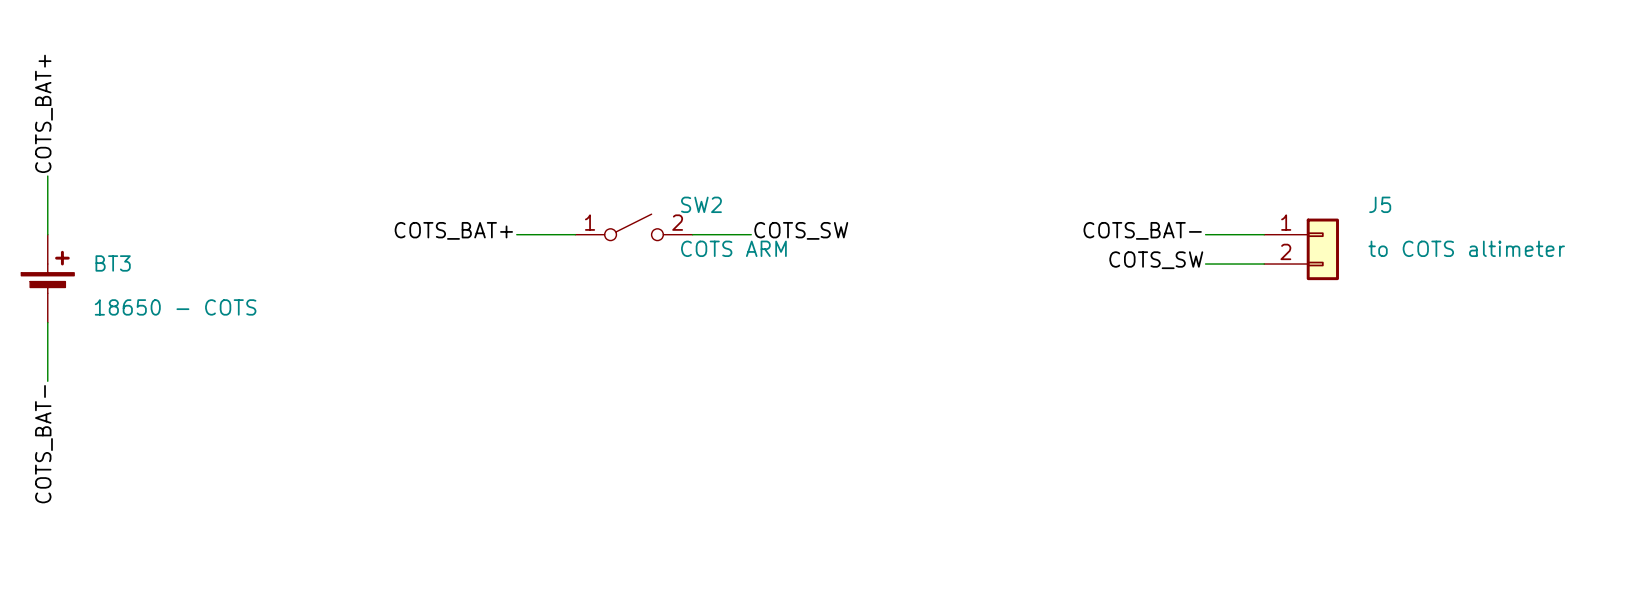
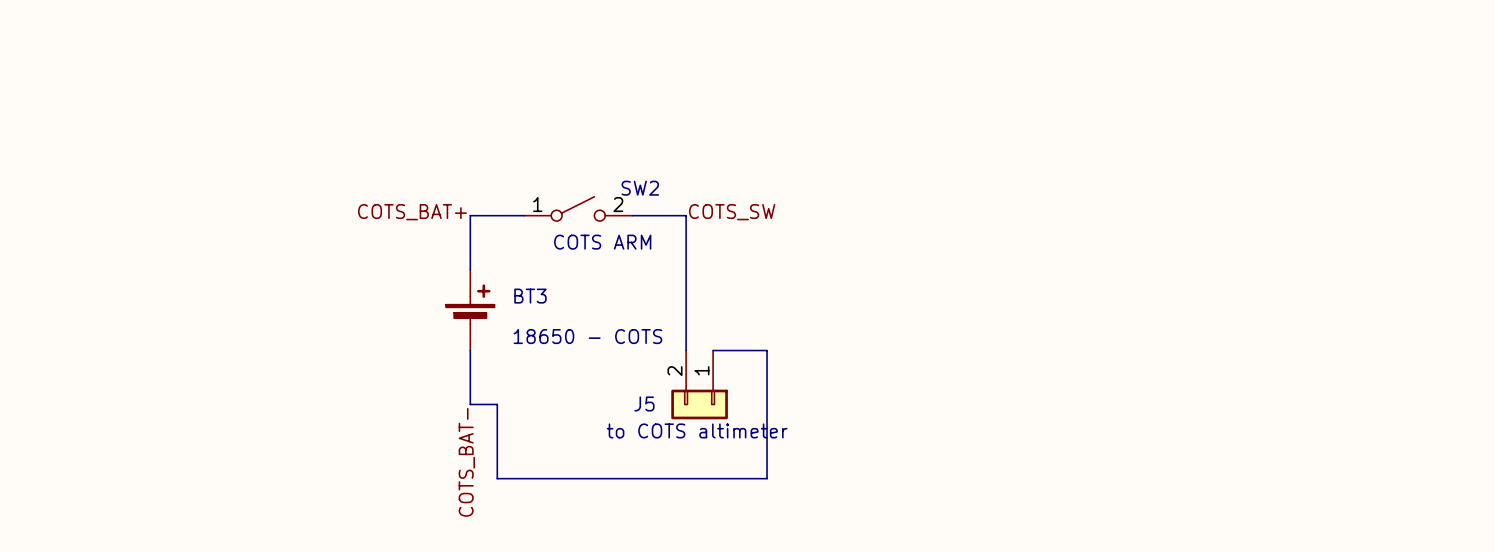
label: COTS_BAT+ (43, 113) -> none
wire: (47, 176) (47, 234) -> none
J5 name position: J5 (1380, 204) -> J5 (644, 403)
label: COTS_BAT- (1142, 230) -> none
wire: none -> (470, 215) (470, 269)
wire: none -> (686, 215) (686, 350)
wire: (1205, 234) (1264, 234) -> none
SW2 value position: COTS ARM (733, 248) -> COTS ARM (602, 242)
J5 value position: to COTS altimeter (1466, 248) -> to COTS altimeter (697, 430)
J5 position: (1301, 249) -> (699, 384)
J5 rotation: 0° (1322, 249) -> 90° clockwise (699, 404)
label: COTS_SW (1156, 260) -> none
wire: (1205, 264) (1264, 264) -> none
BT3 position: (47, 278) -> (470, 310)
wire: (47, 322) (47, 381) -> none
wire: none -> (470, 350) (470, 404) (497, 404) (497, 478) (767, 478) (767, 350) (713, 350)
label: COTS_BAT- (43, 444) -> none
label: none -> COTS_BAT- (466, 462)

